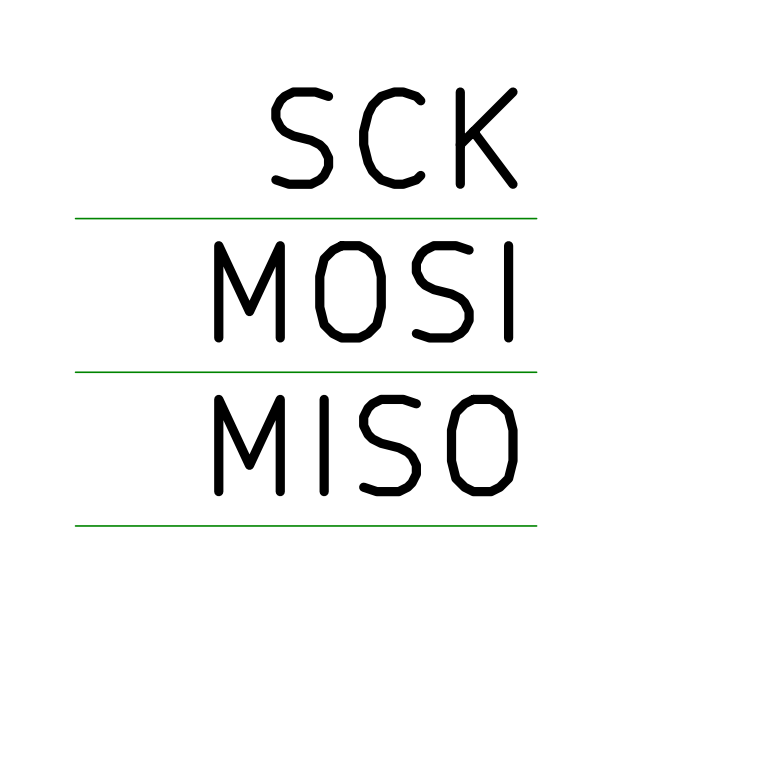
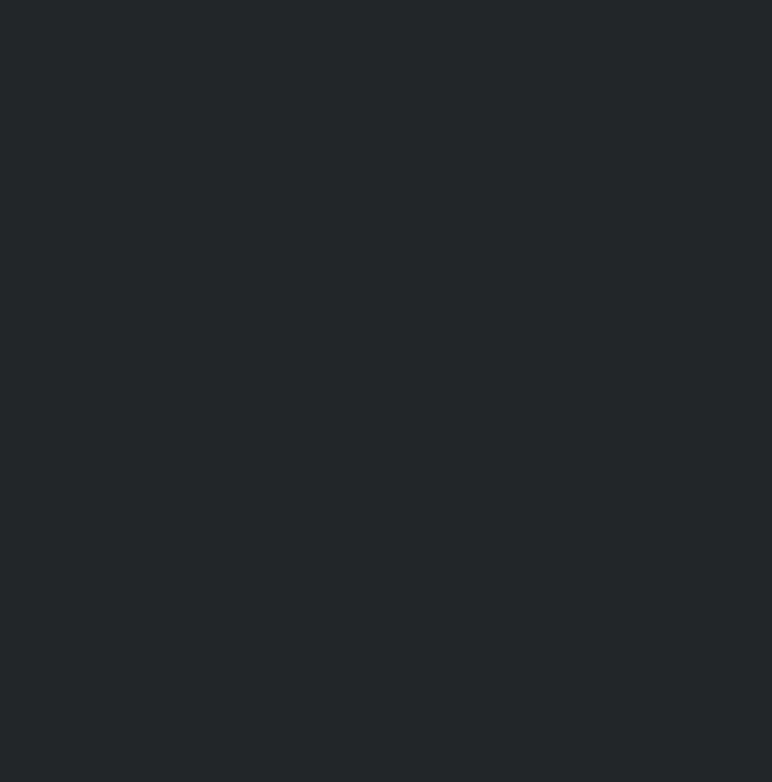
label: SCK (394, 138) -> none
wire: (75, 218) (536, 218) -> none
label: MOSI (363, 291) -> none
wire: (75, 372) (536, 372) -> none
label: MISO (365, 445) -> none
wire: (75, 525) (536, 525) -> none

